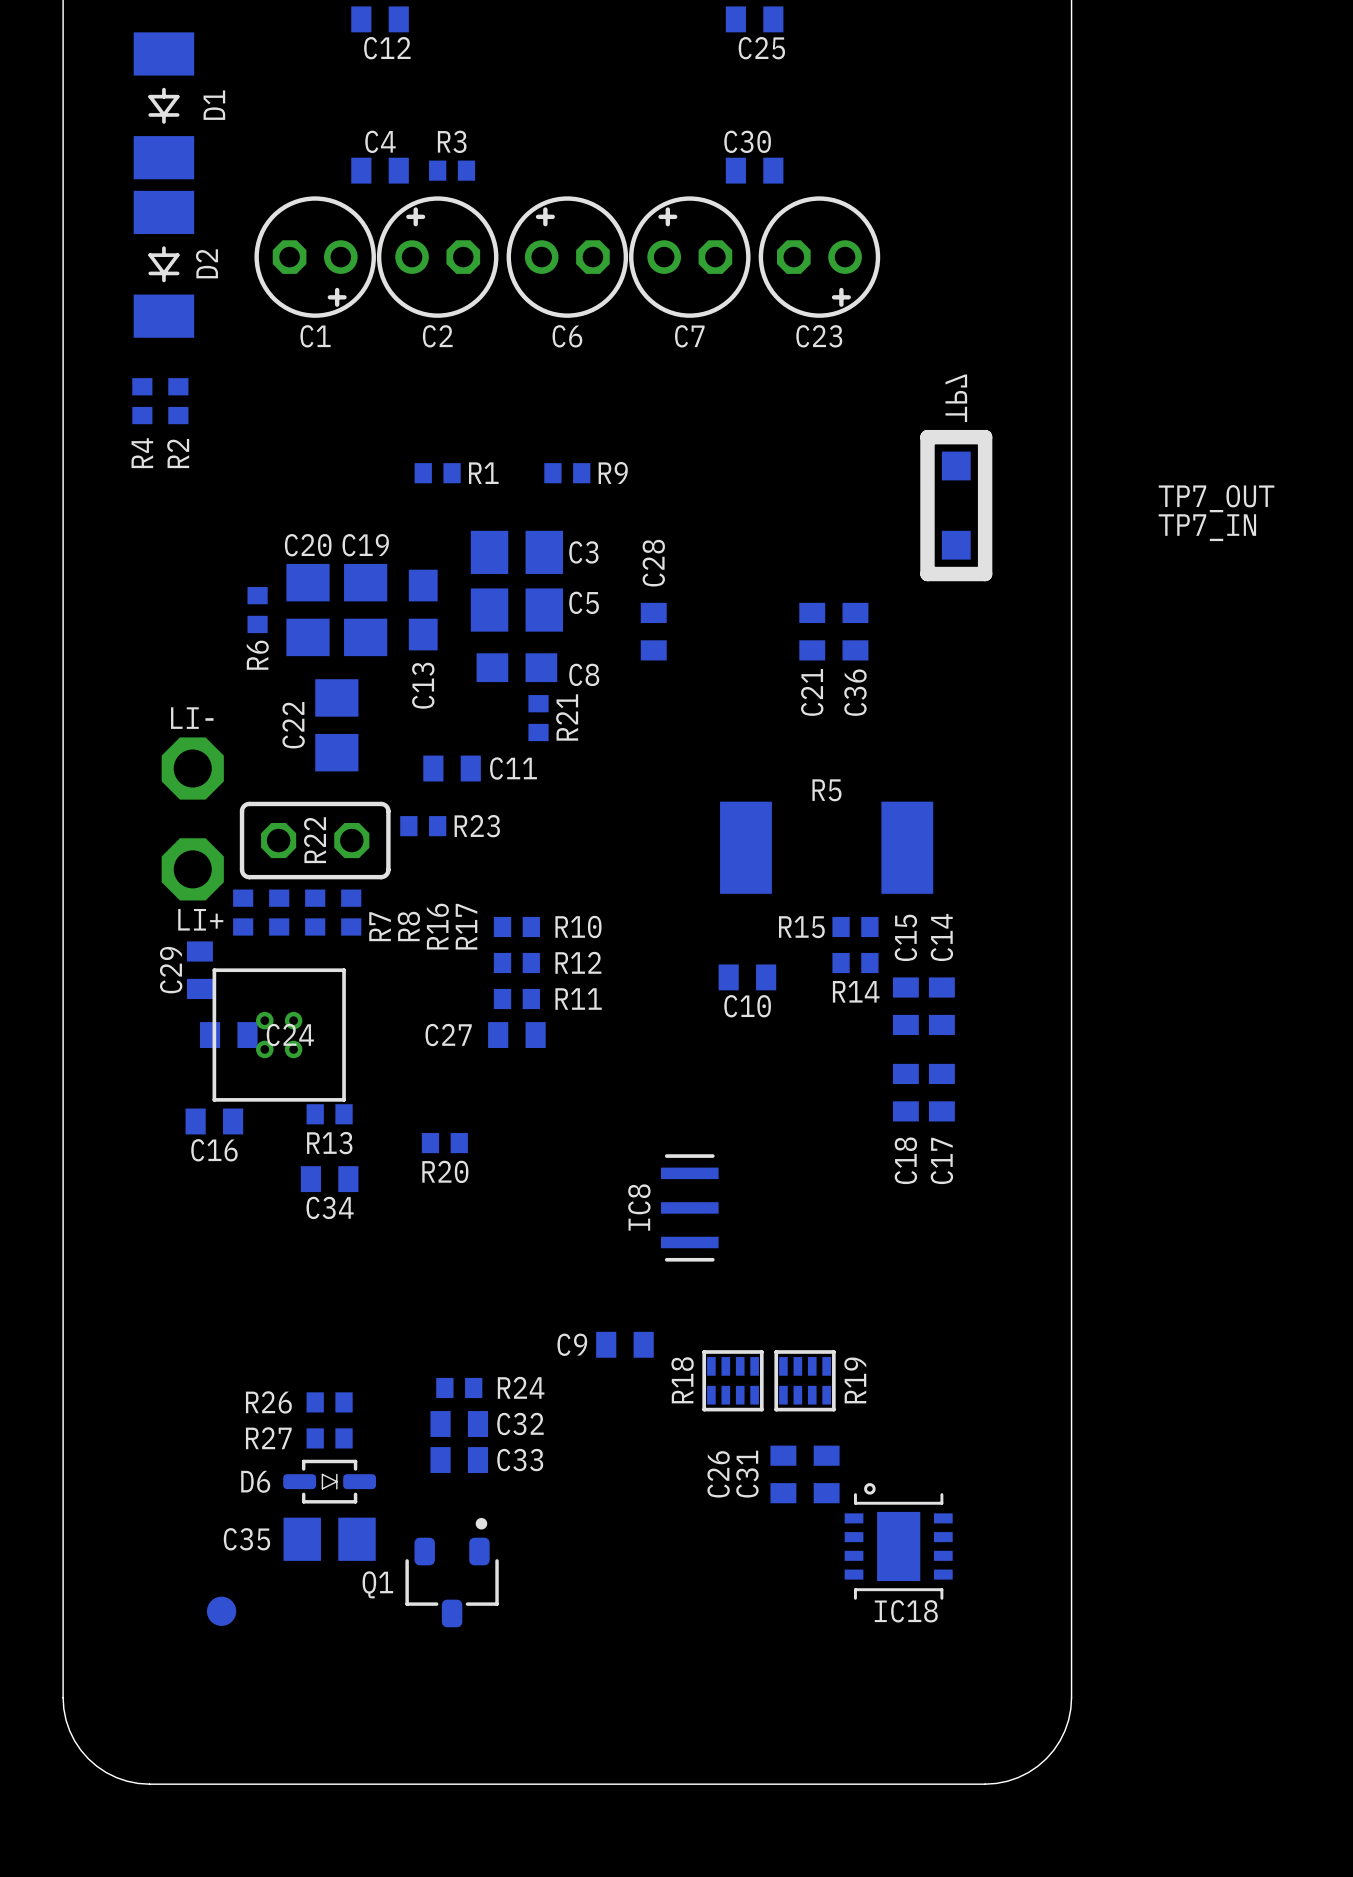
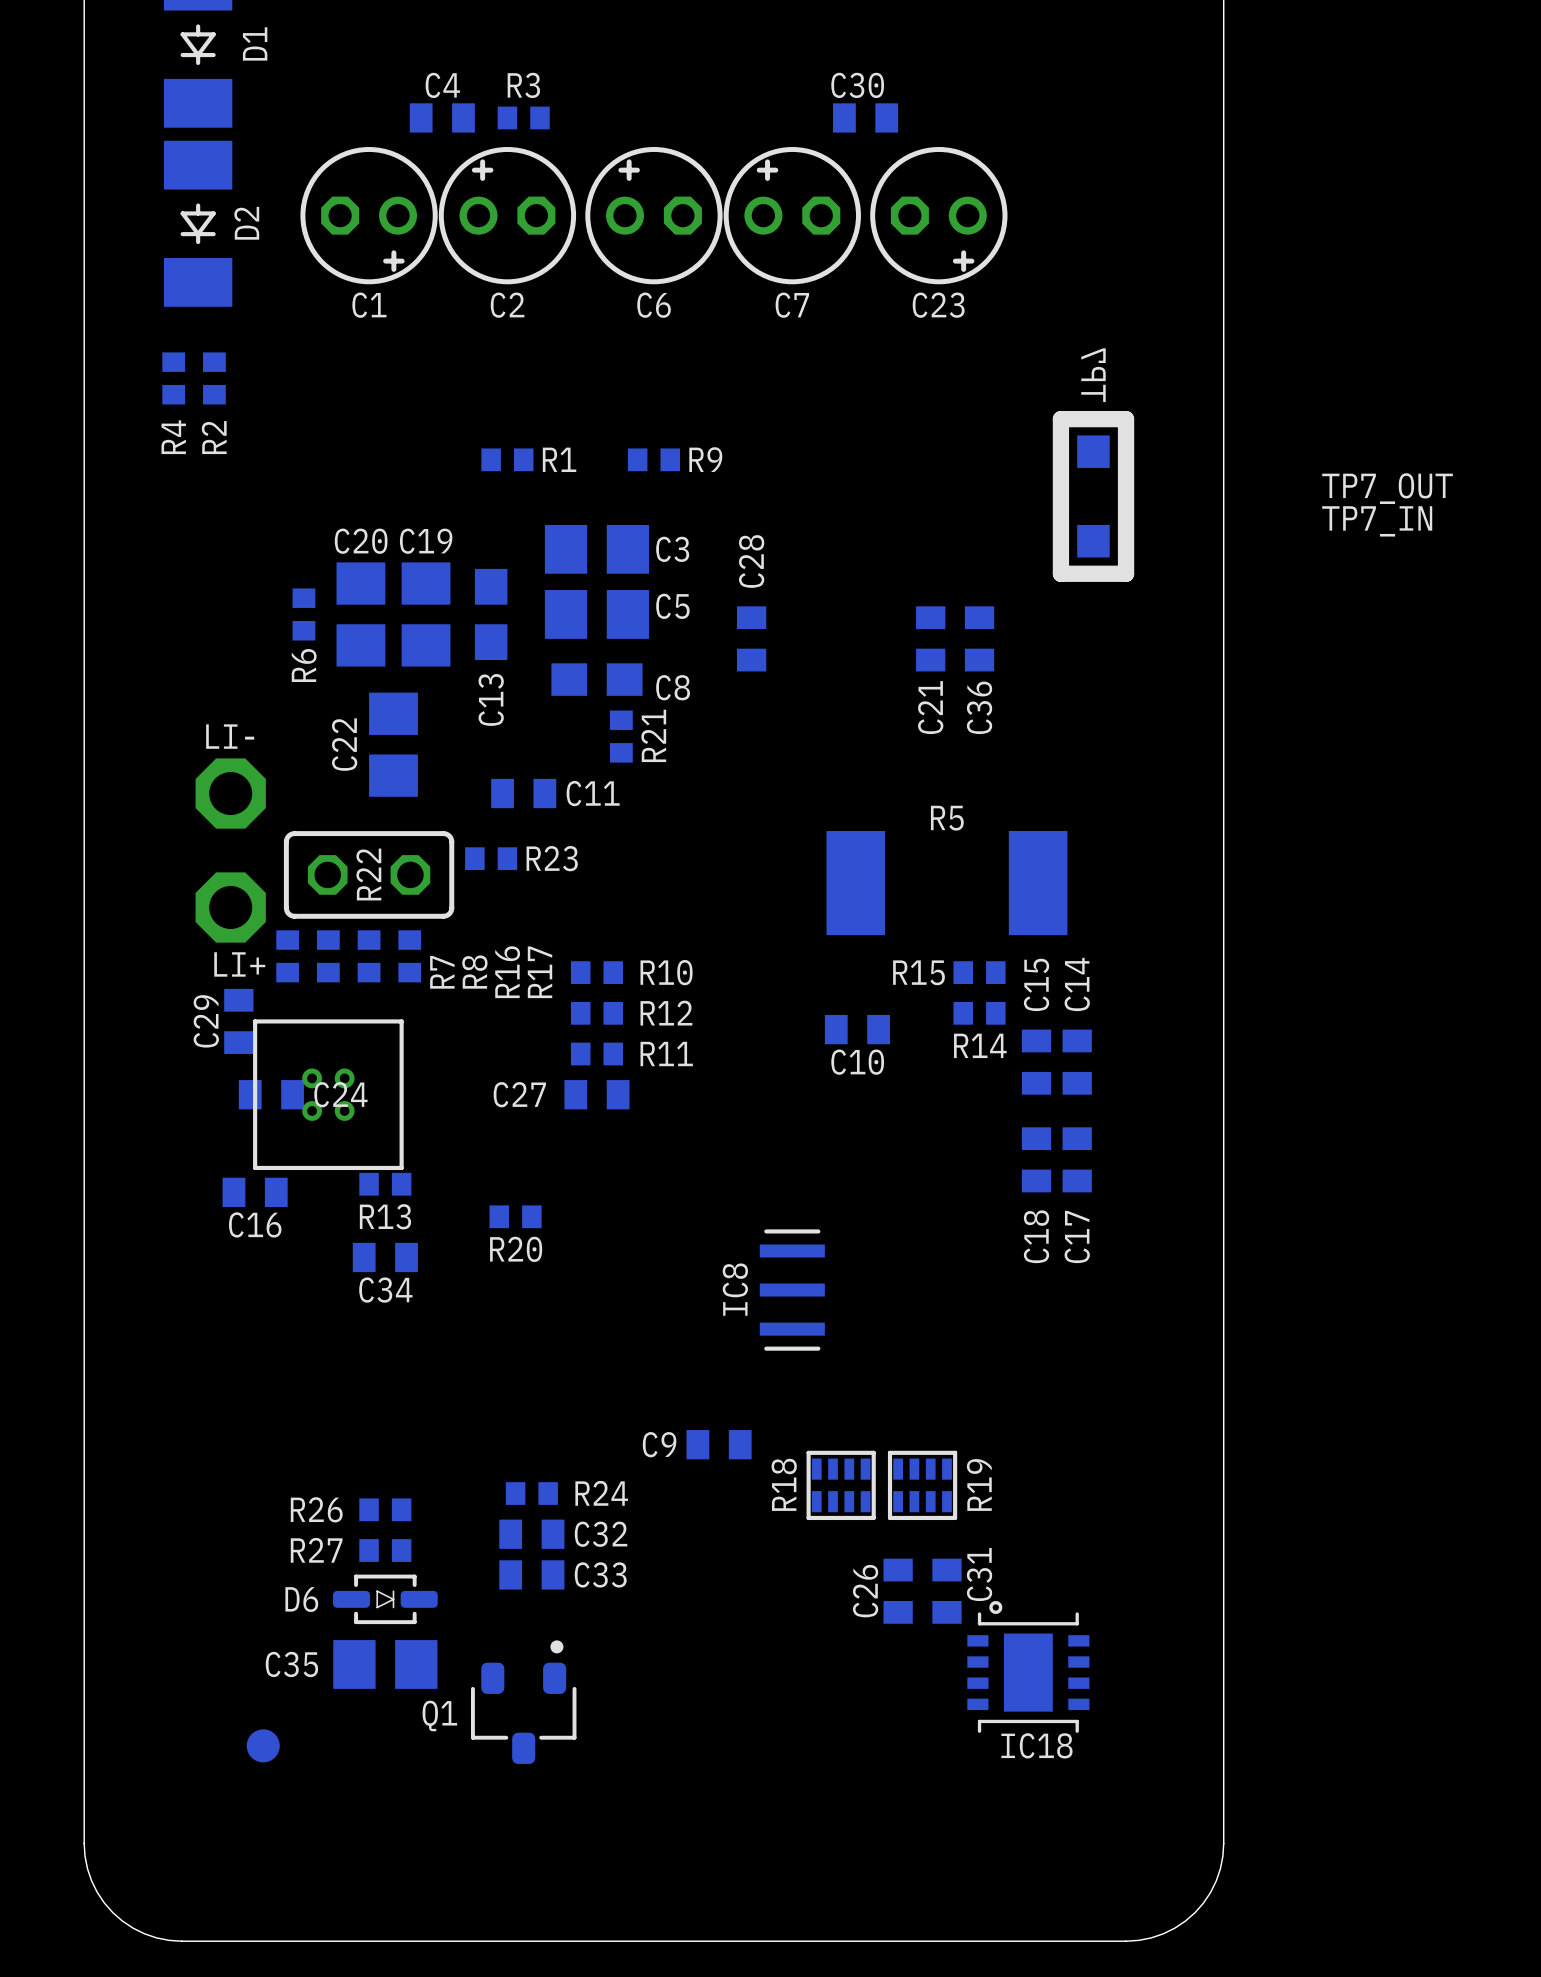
C26 name position: C26 (718, 1474) -> C26 (865, 1591)
C31 name position: C31 (747, 1474) -> C31 (979, 1574)

